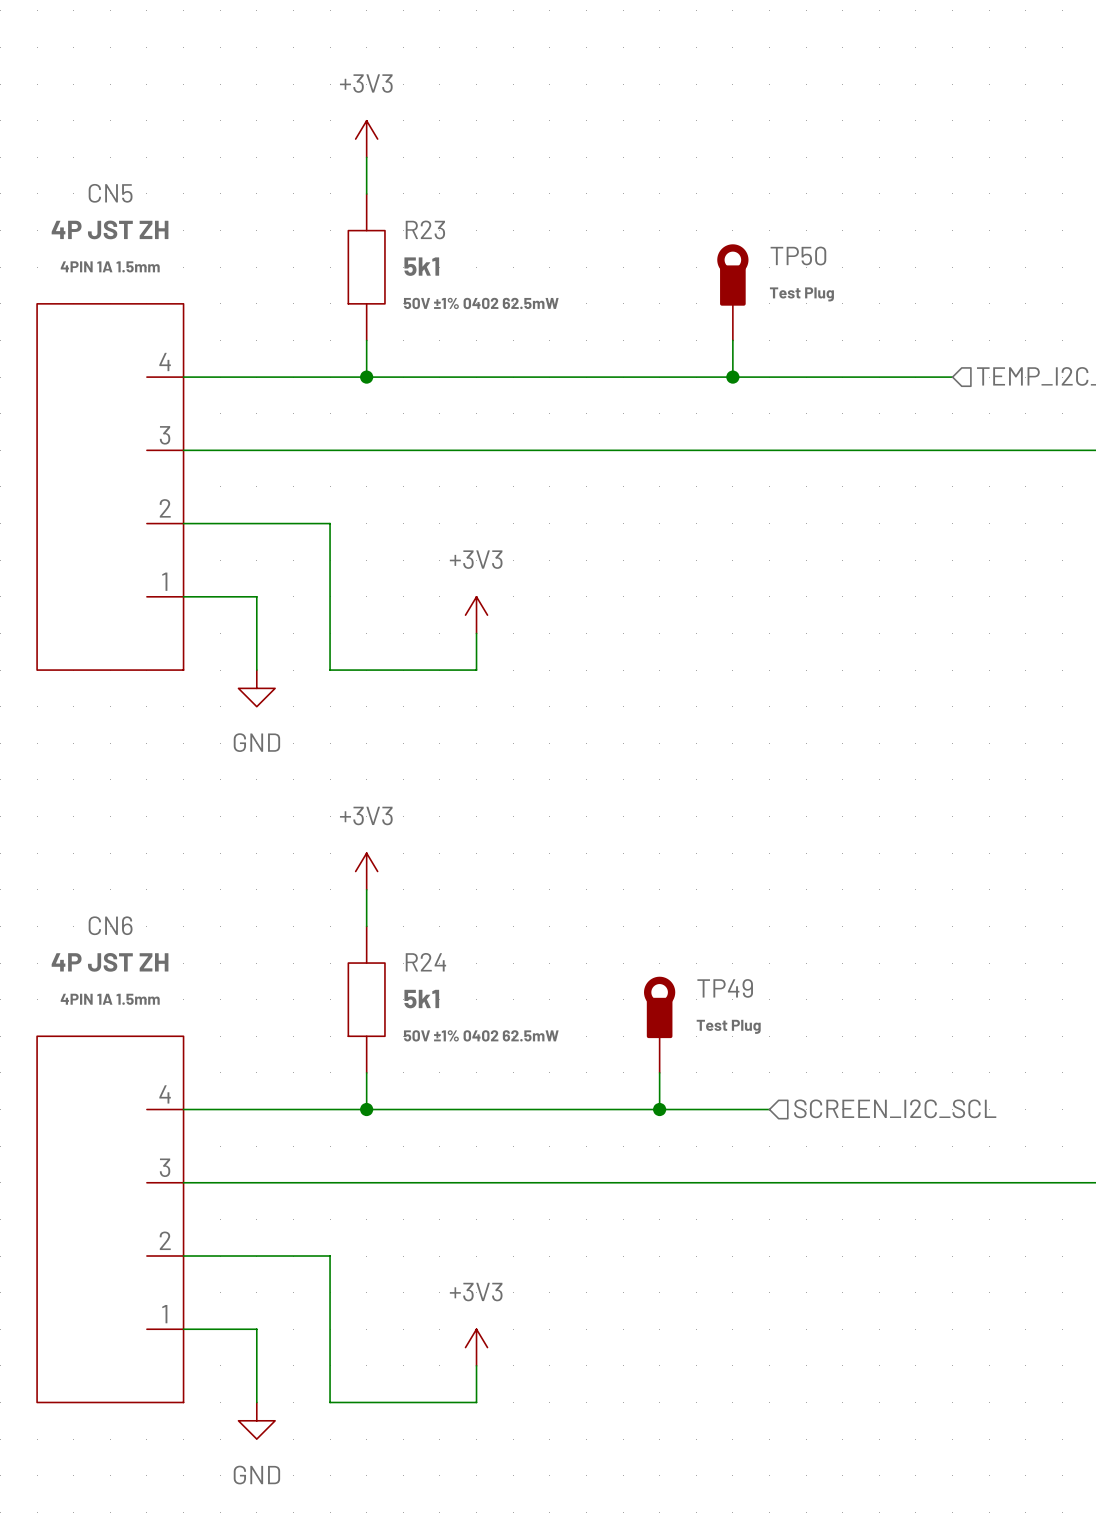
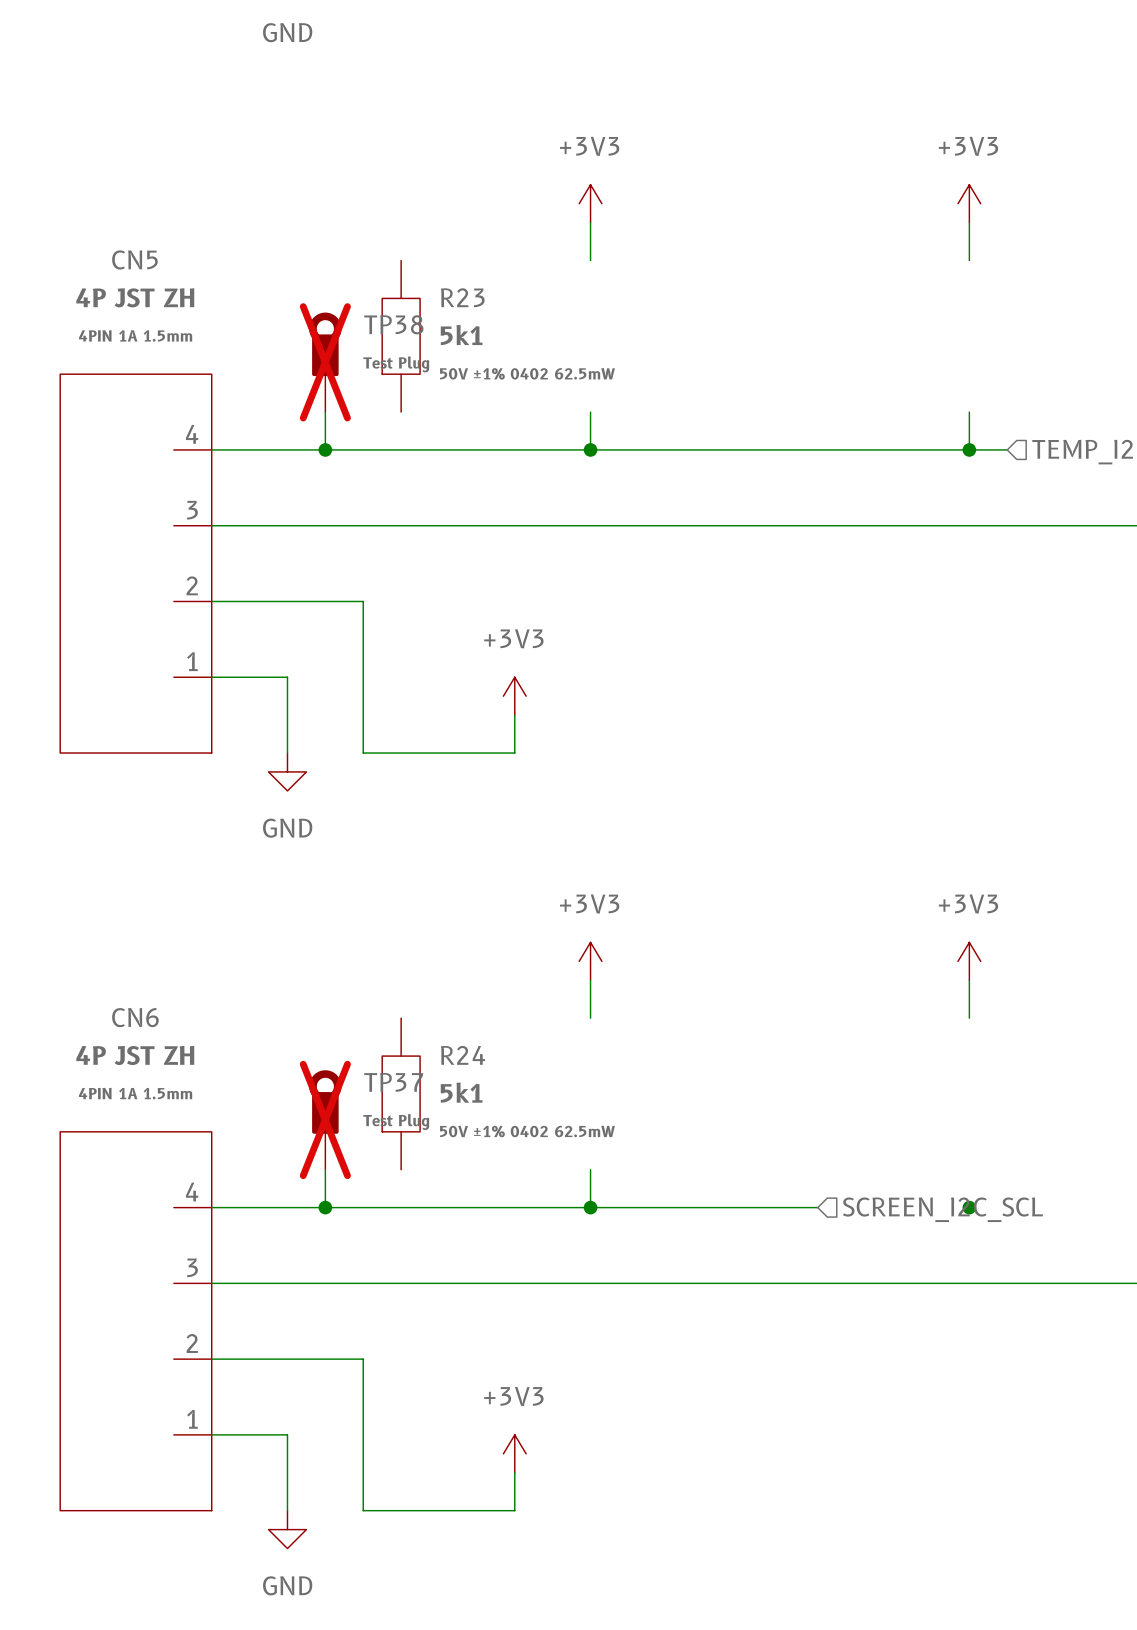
power symbol position: +3V3 (366, 139) -> +3V3 (590, 203)
power symbol: none -> +3V3 (969, 203)
wire: (366, 157) (366, 193) -> (590, 222) (590, 260)
wire: none -> (969, 222) (969, 260)
TP38: none -> (325, 362)
TP50: (732, 292) -> none
wire: none -> (325, 412) (325, 449)
wire: (366, 340) (366, 377) -> (590, 412) (590, 449)
wire: (732, 340) (732, 377) -> (969, 412) (969, 449)
junction position: (366, 377) -> (325, 449)
junction: none -> (590, 449)
junction: (732, 377) -> none
junction: none -> (969, 449)
power symbol position: +3V3 (366, 871) -> +3V3 (590, 961)
power symbol: none -> +3V3 (969, 961)
wire: (366, 889) (366, 926) -> (590, 980) (590, 1018)
TP37: none -> (325, 1119)
TP49: (659, 1024) -> none
wire: none -> (325, 1169) (325, 1207)
wire: (366, 1072) (366, 1109) -> (590, 1169) (590, 1207)
wire: (659, 1072) (659, 1109) -> (969, 980) (969, 1018)
junction position: (366, 1109) -> (325, 1207)
junction: none -> (590, 1207)
junction: (659, 1109) -> none
junction: none -> (969, 1207)

